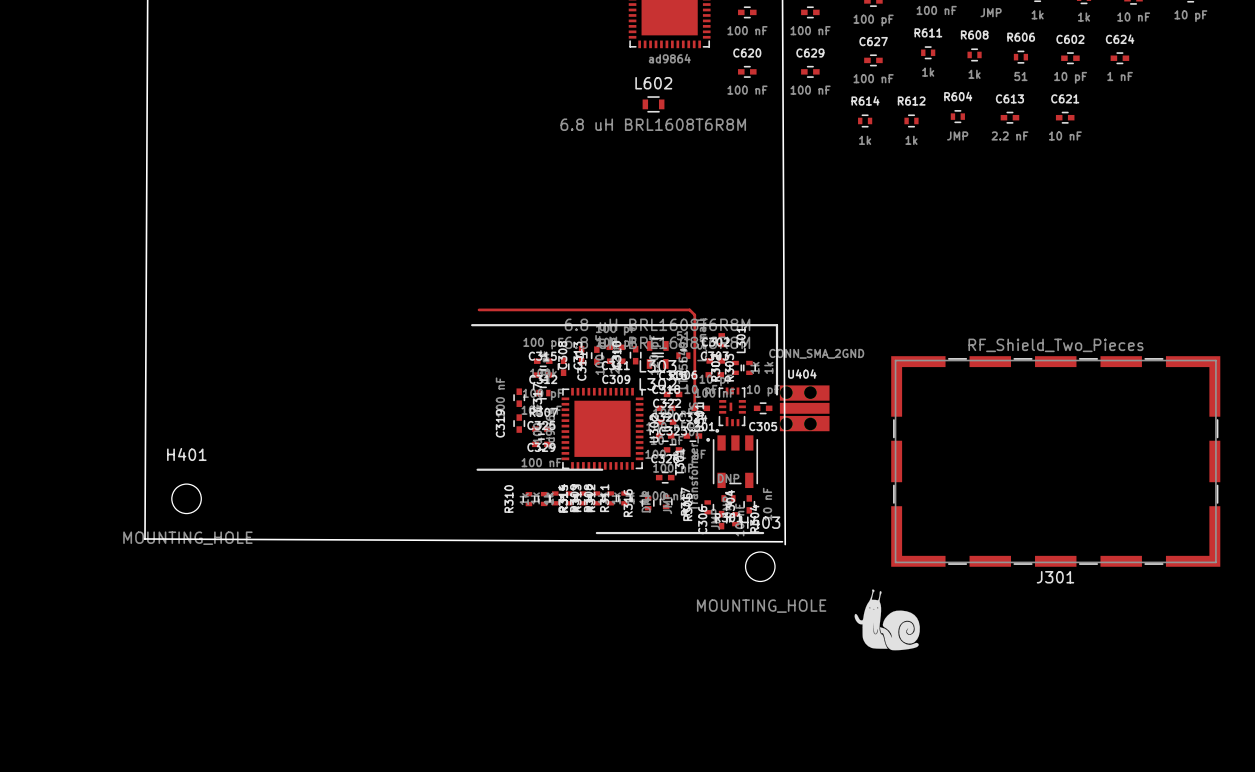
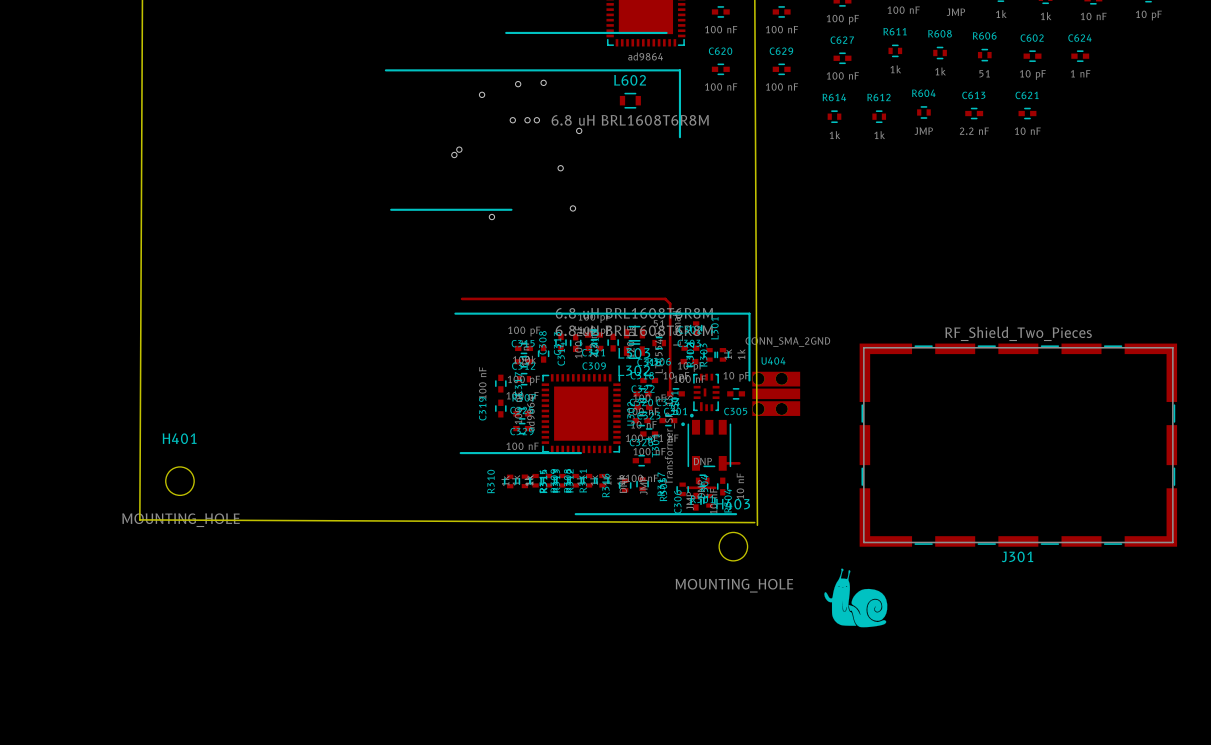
line: none -> (506, 32) (666, 32)
line: none -> (385, 70) (679, 70) (679, 137)
via: none -> (543, 82)
via: none -> (518, 84)
via: none -> (482, 94)
via: none -> (512, 120)
via: none -> (527, 120)
via: none -> (536, 120)
via: none -> (579, 130)
via: none -> (459, 149)
via: none -> (454, 154)
via: none -> (560, 168)
via: none -> (572, 208)
line: none -> (391, 209) (511, 209)
via: none -> (491, 217)
track: none -> (722, 463) (739, 463)
track: none -> (687, 487) (715, 487)

